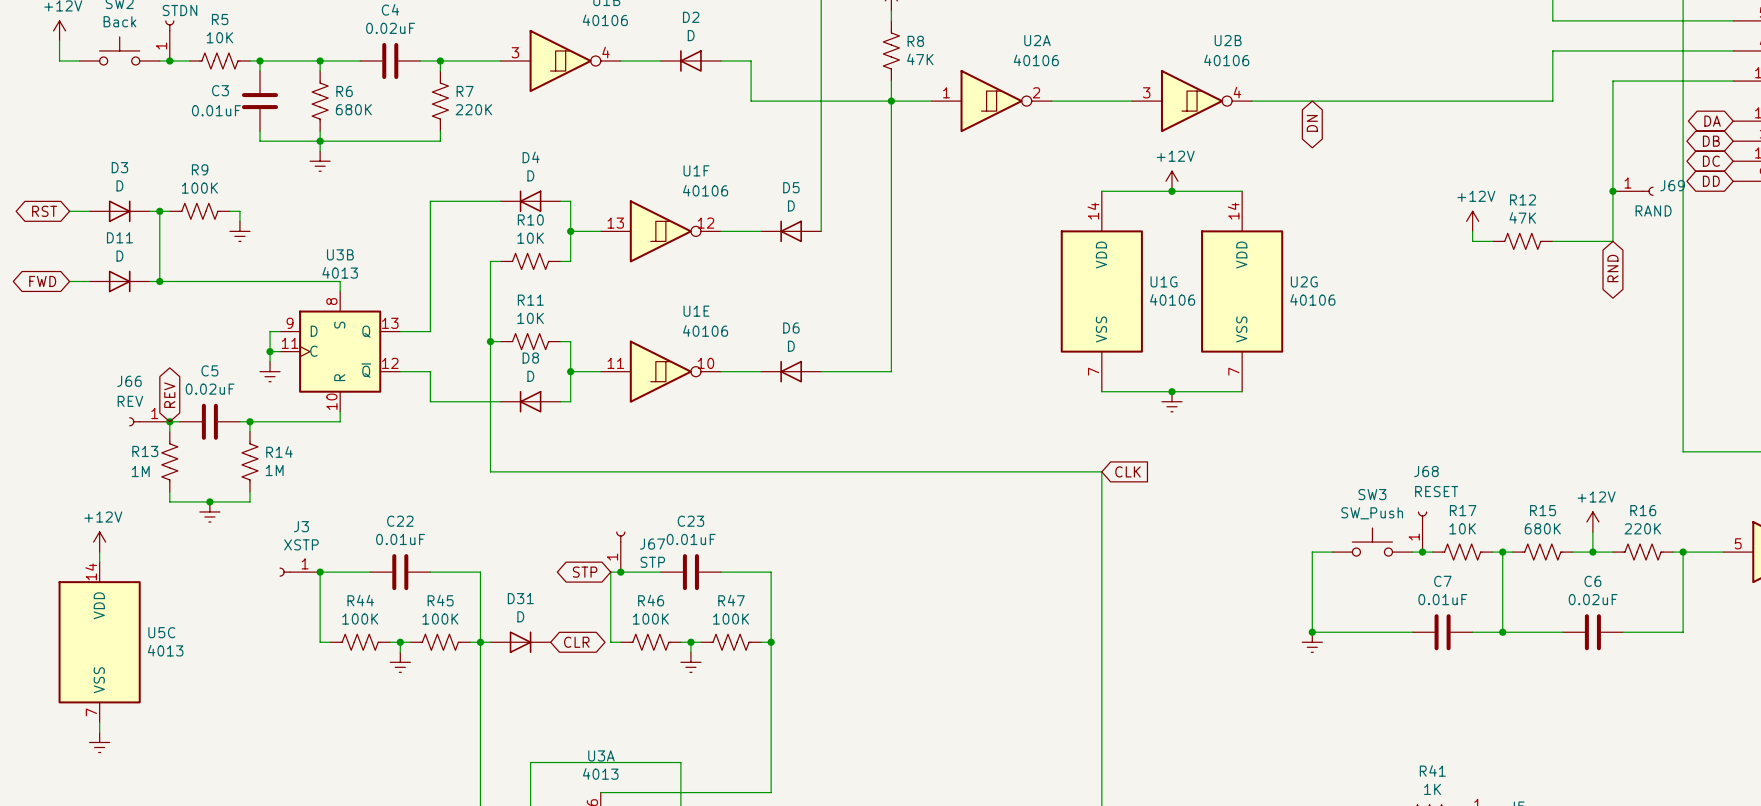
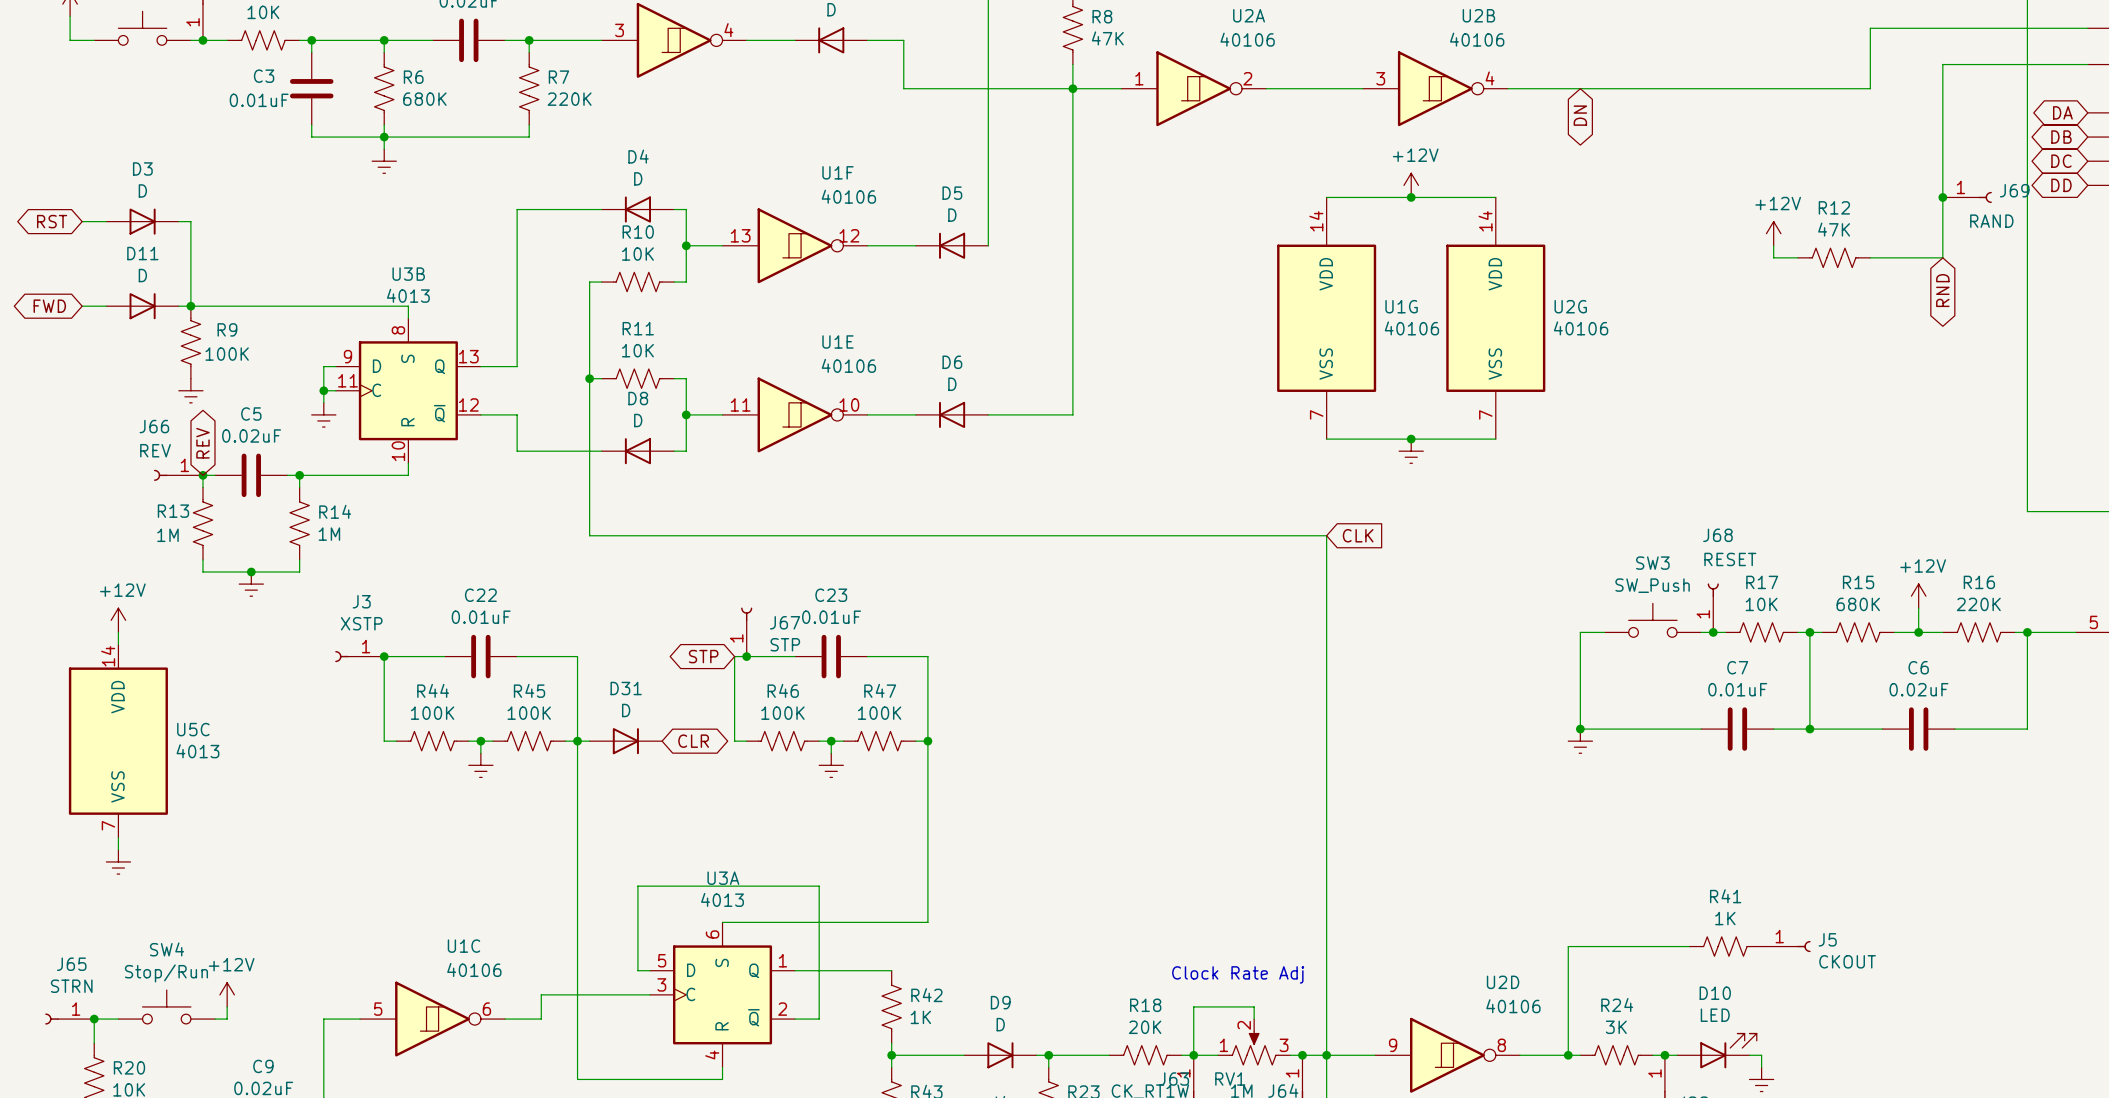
wire: (159, 211) (169, 211) -> none
junction: (159, 211) -> none
R9 rotation: 0° (199, 211) -> 90° clockwise (190, 342)
R9 position: (199, 211) -> (190, 342)
wire: (229, 211) (239, 211) (239, 221) -> none
power symbol position: (239, 231) -> (190, 390)

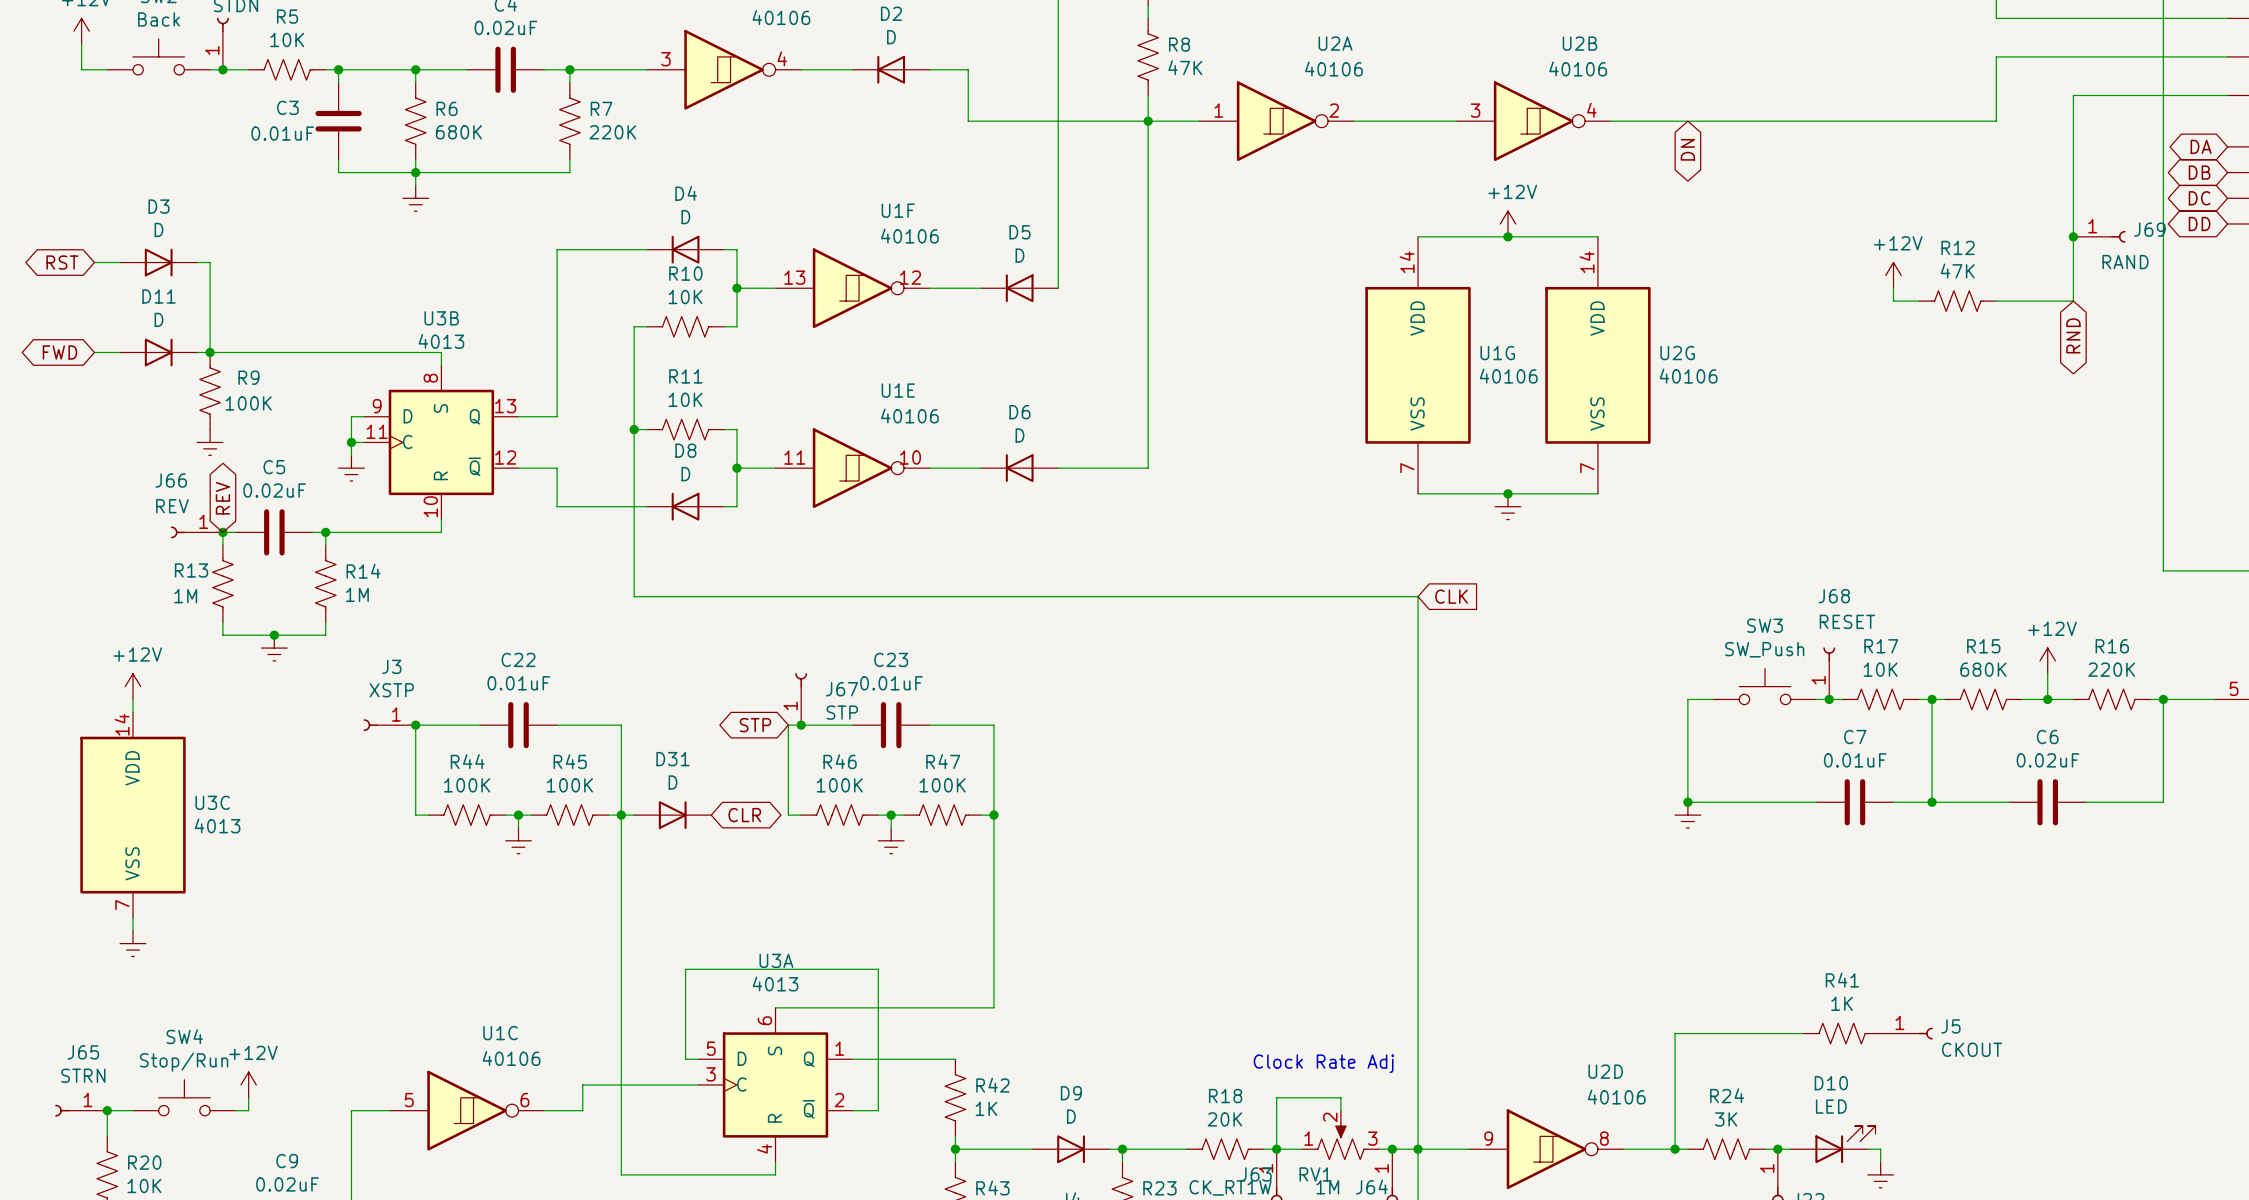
U5C name: U5C (193, 729) -> U3C (212, 802)

